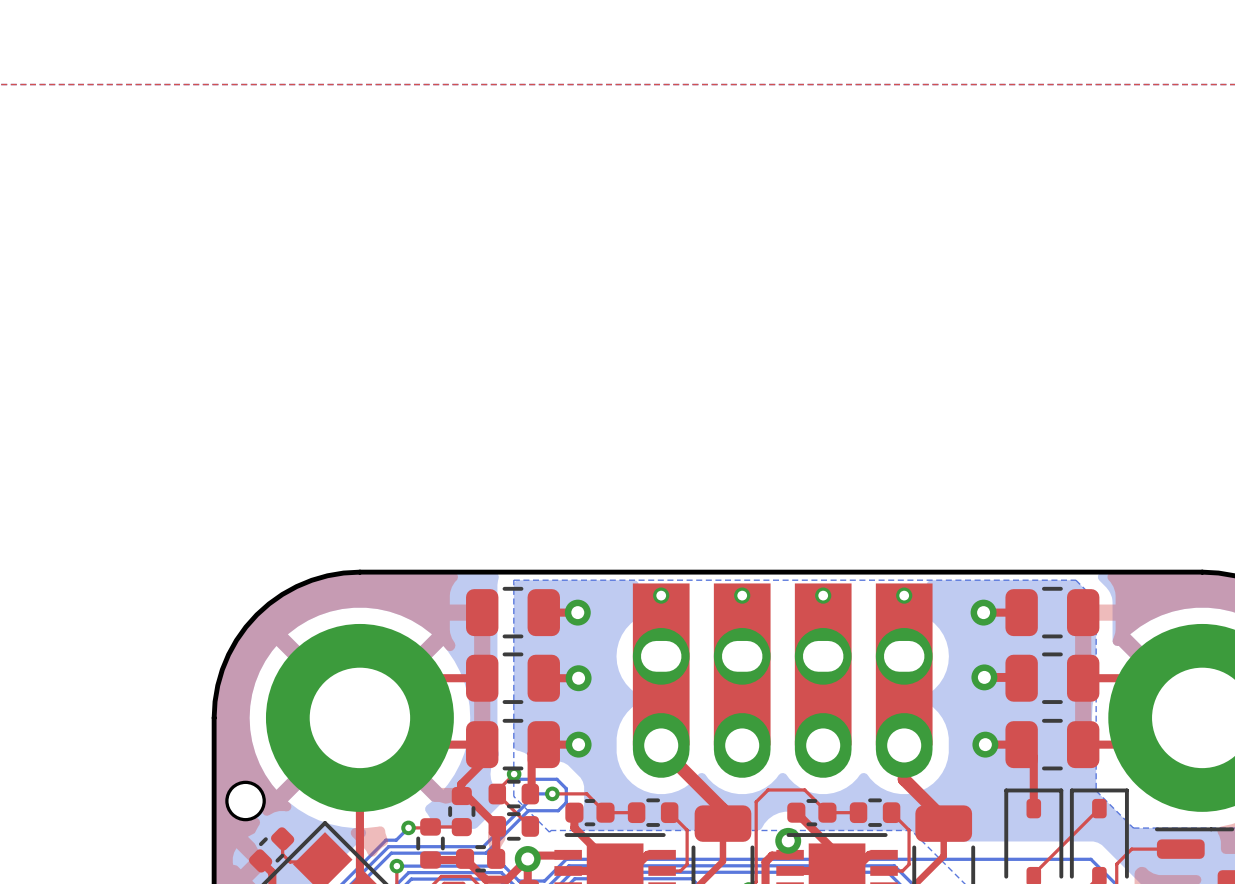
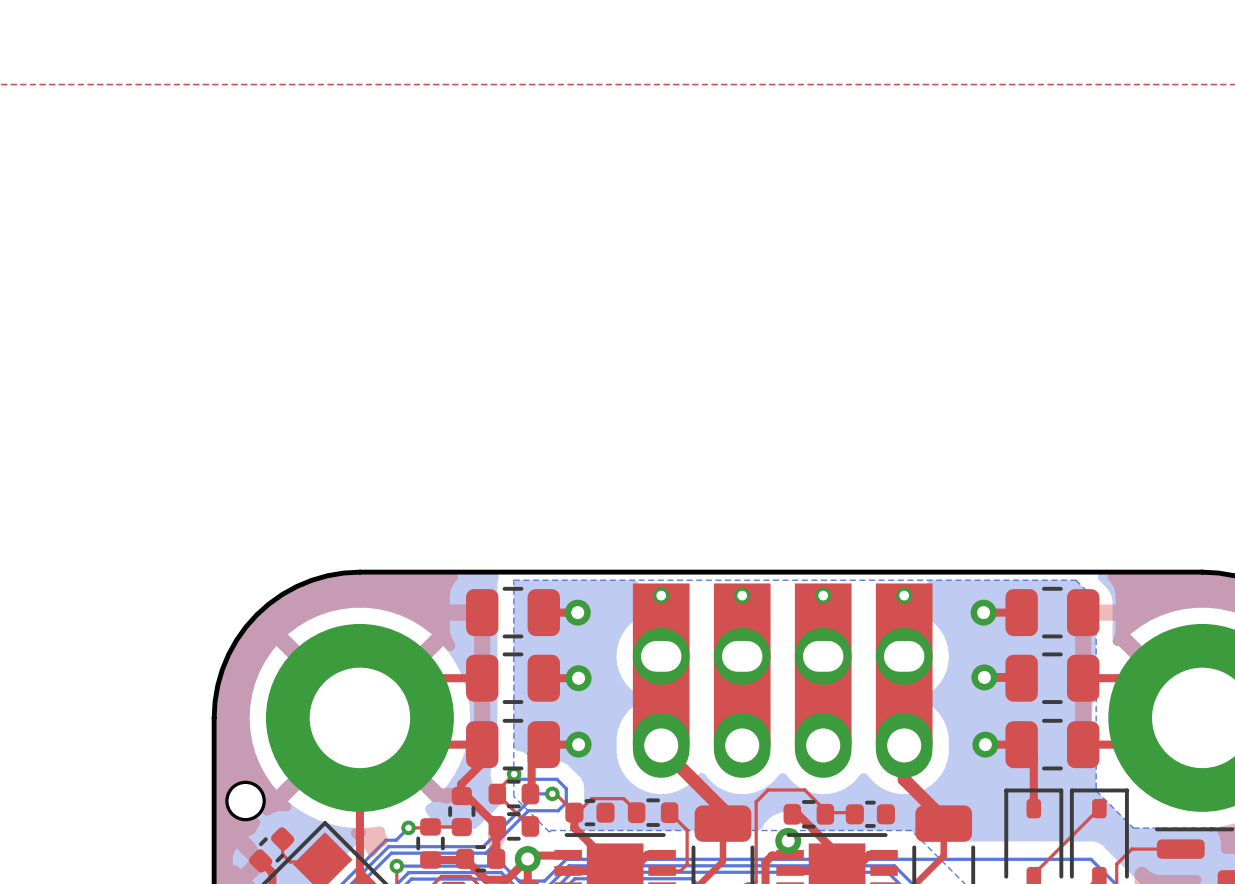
top track: (555, 793) (586, 793) (605, 812) (636, 812) -> (555, 793) (576, 814) (591, 798) (623, 798) (639, 814)
part footprint: [849, 798, 901, 827] -> [845, 800, 896, 828]
part footprint: [787, 799, 837, 827] -> [783, 800, 835, 829]
top track: (891, 812) (909, 830) (909, 864) (902, 870) (884, 870) -> none

